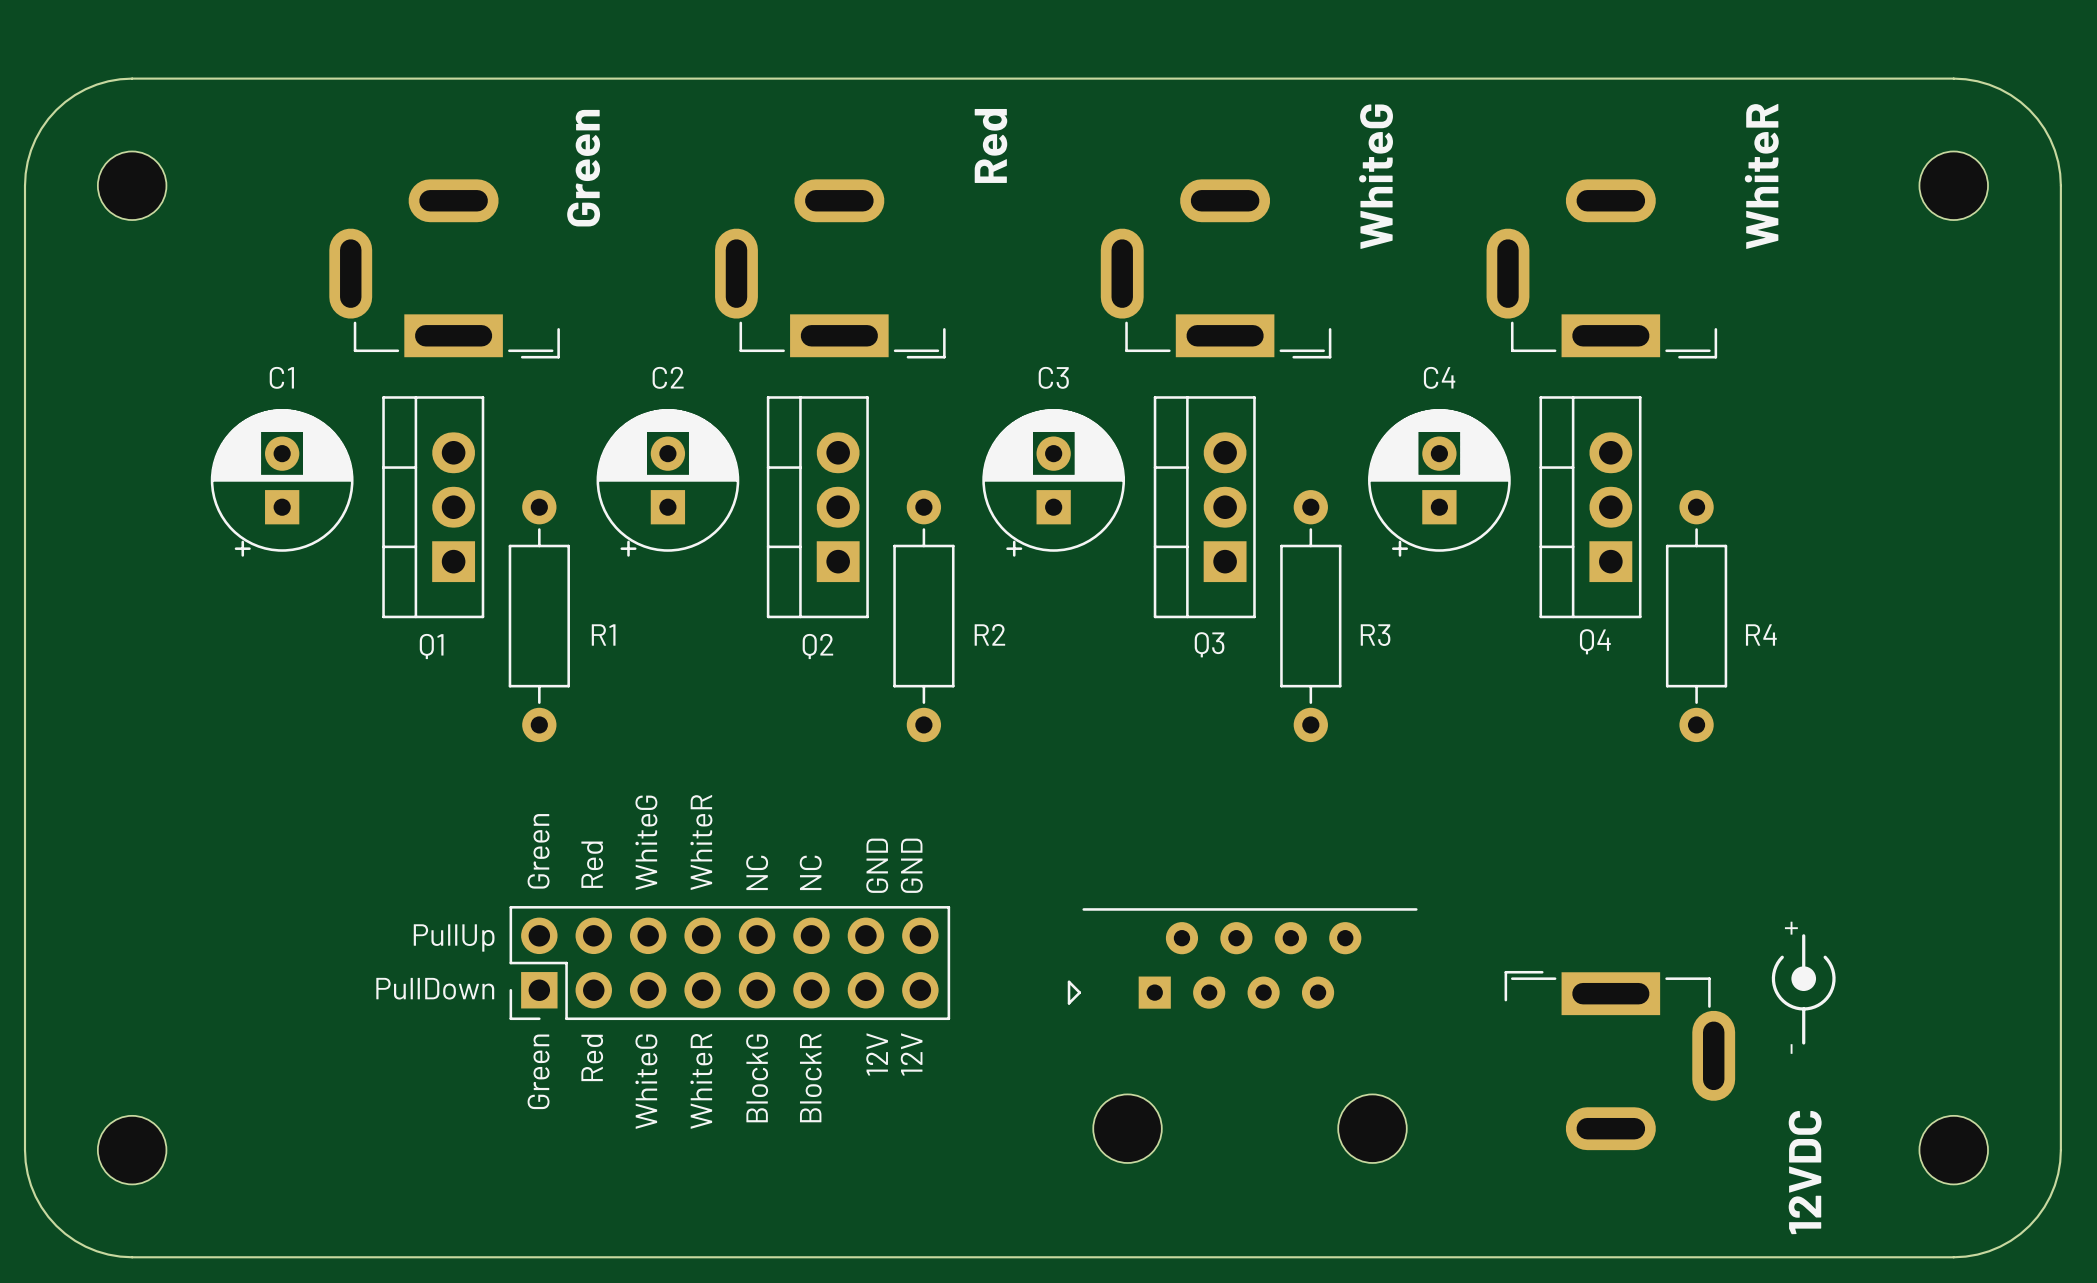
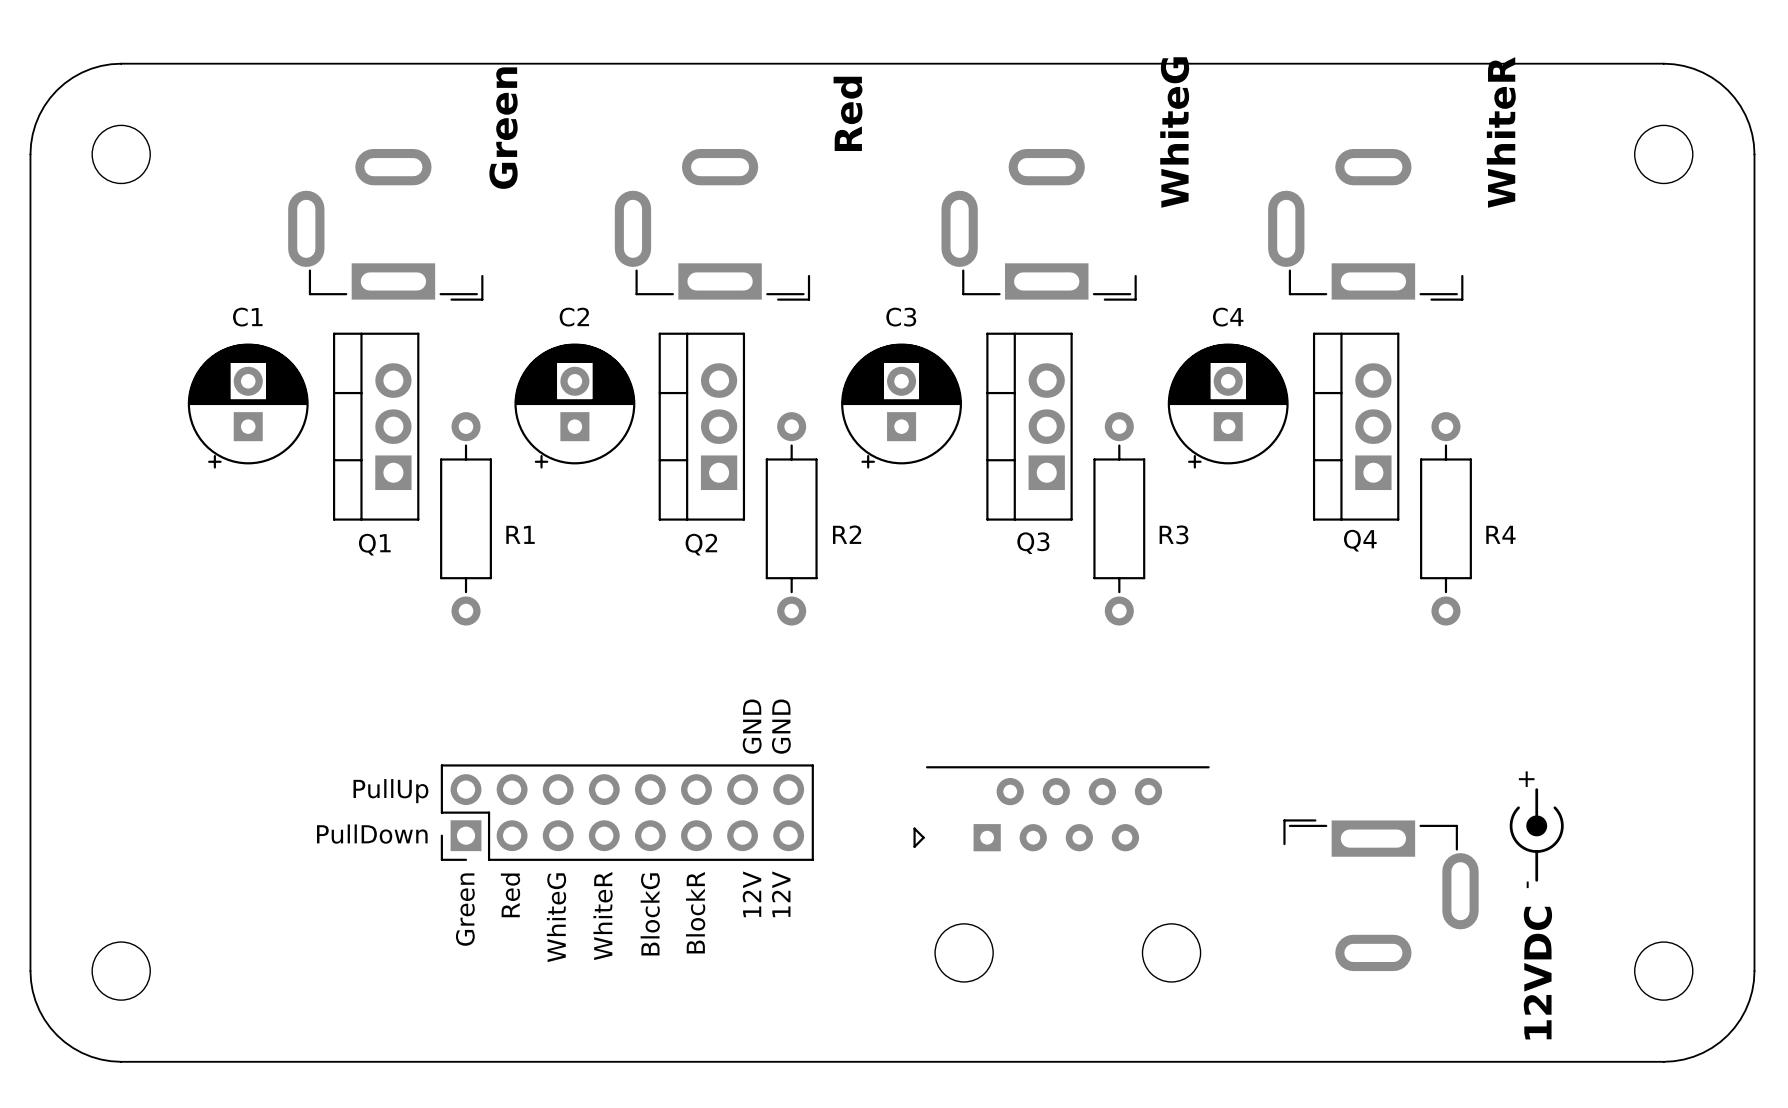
text: WhiteG (646, 842) -> none
text: WhiteR (701, 842) -> none
text: Green (538, 851) -> none
text: Red (592, 864) -> none
text: NC (757, 872) -> none
text: NC (810, 872) -> none

